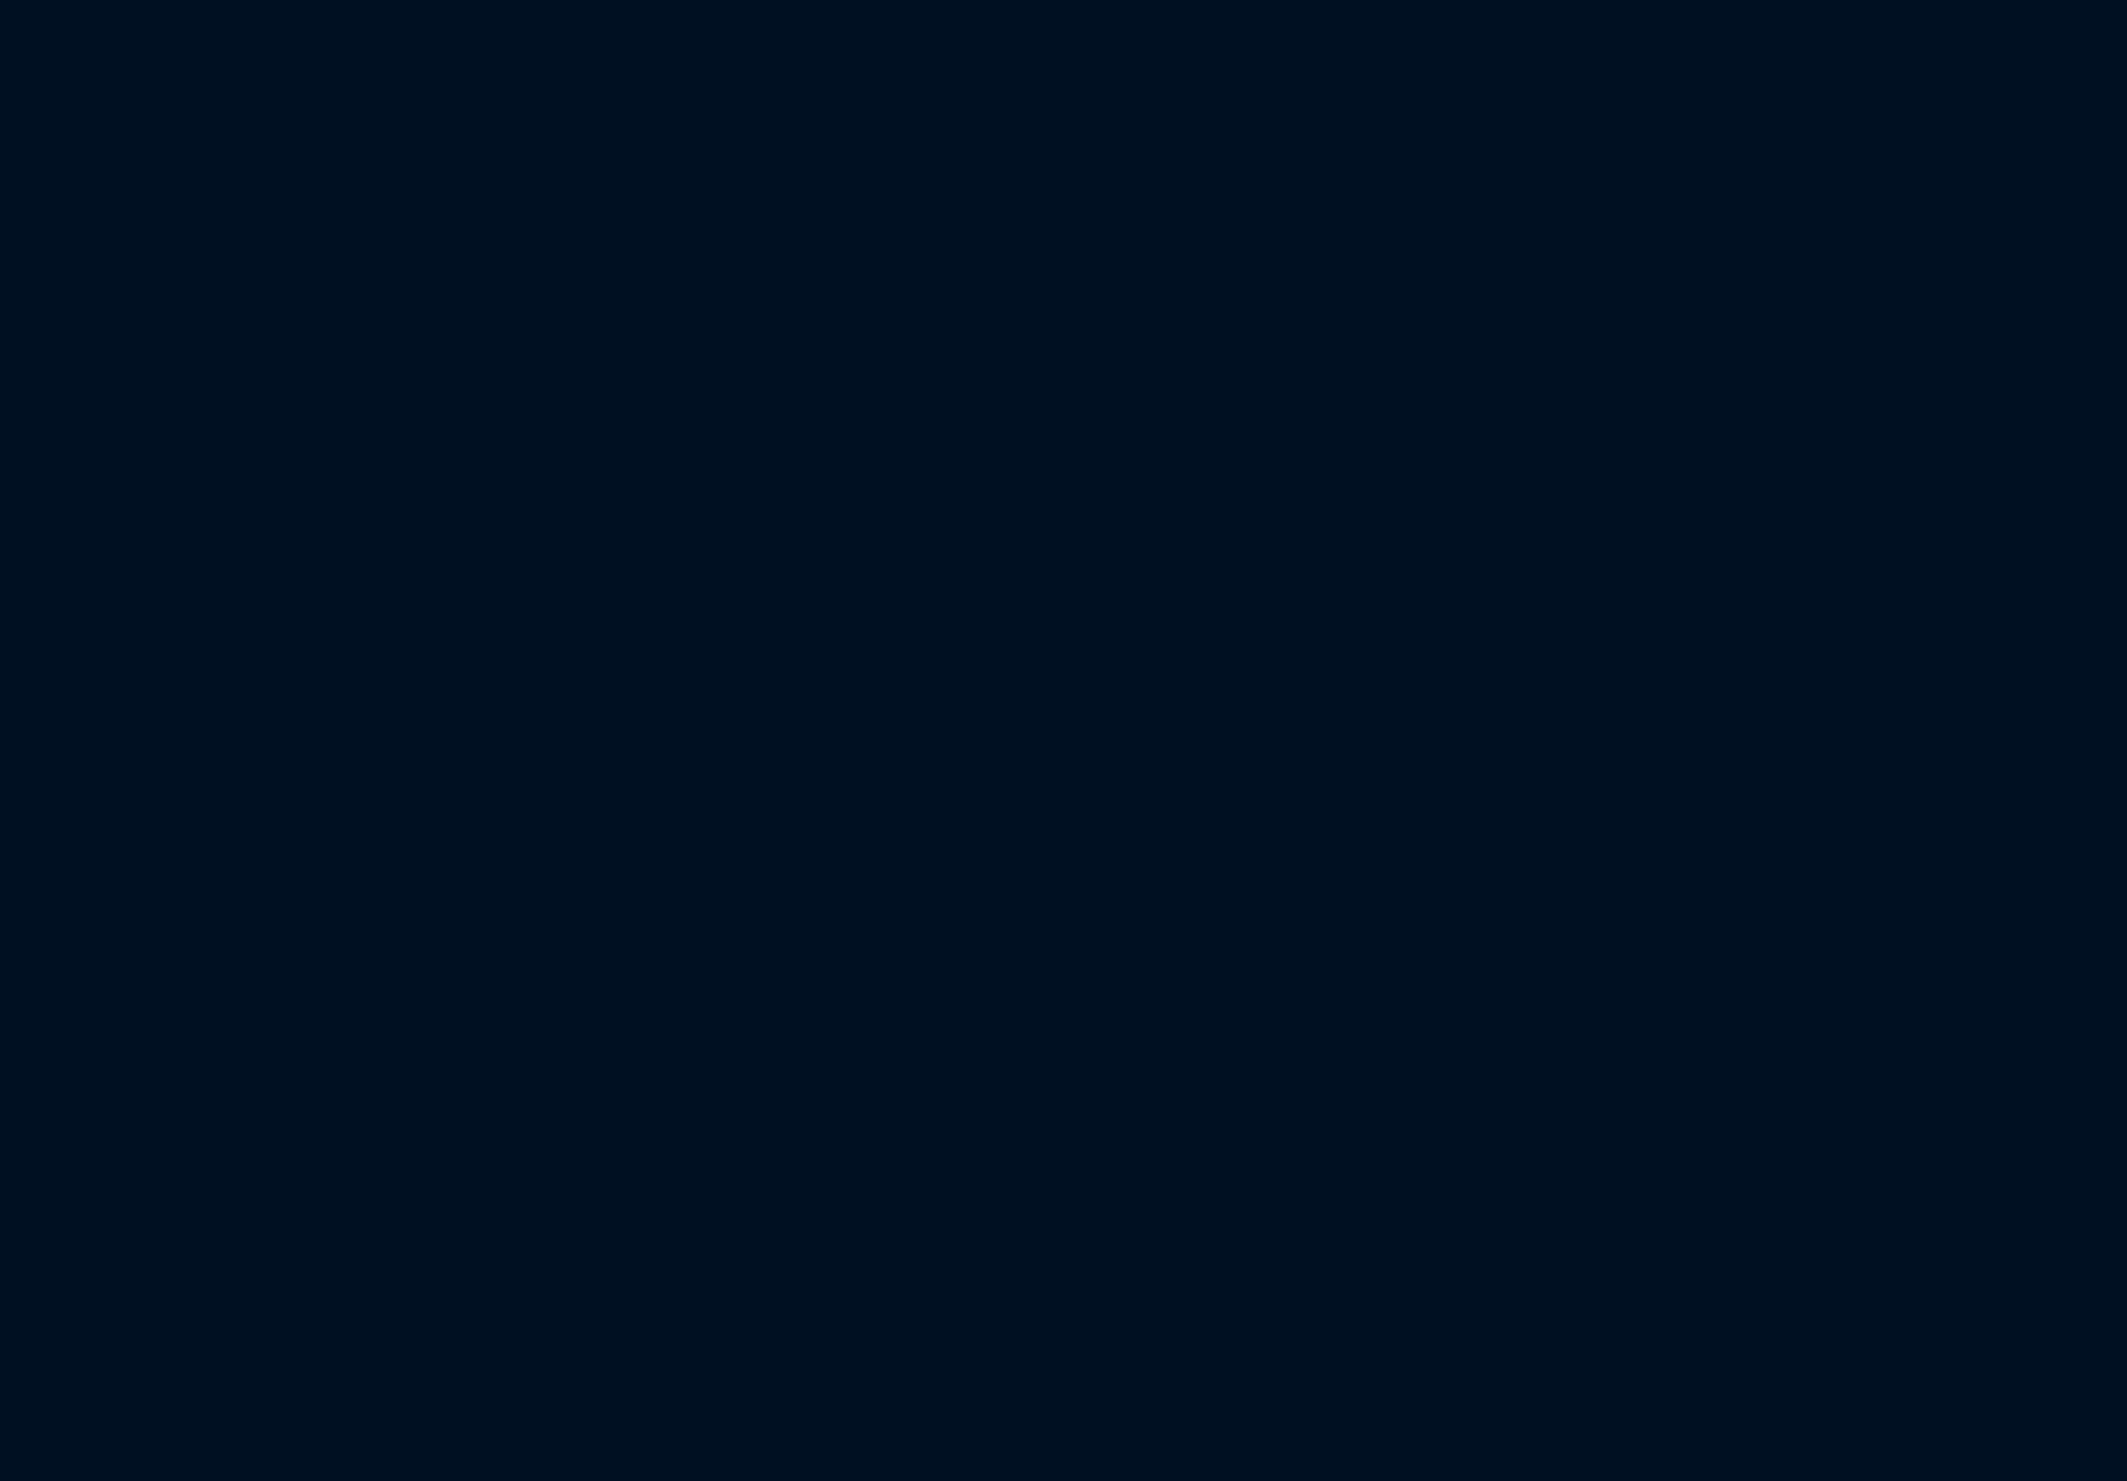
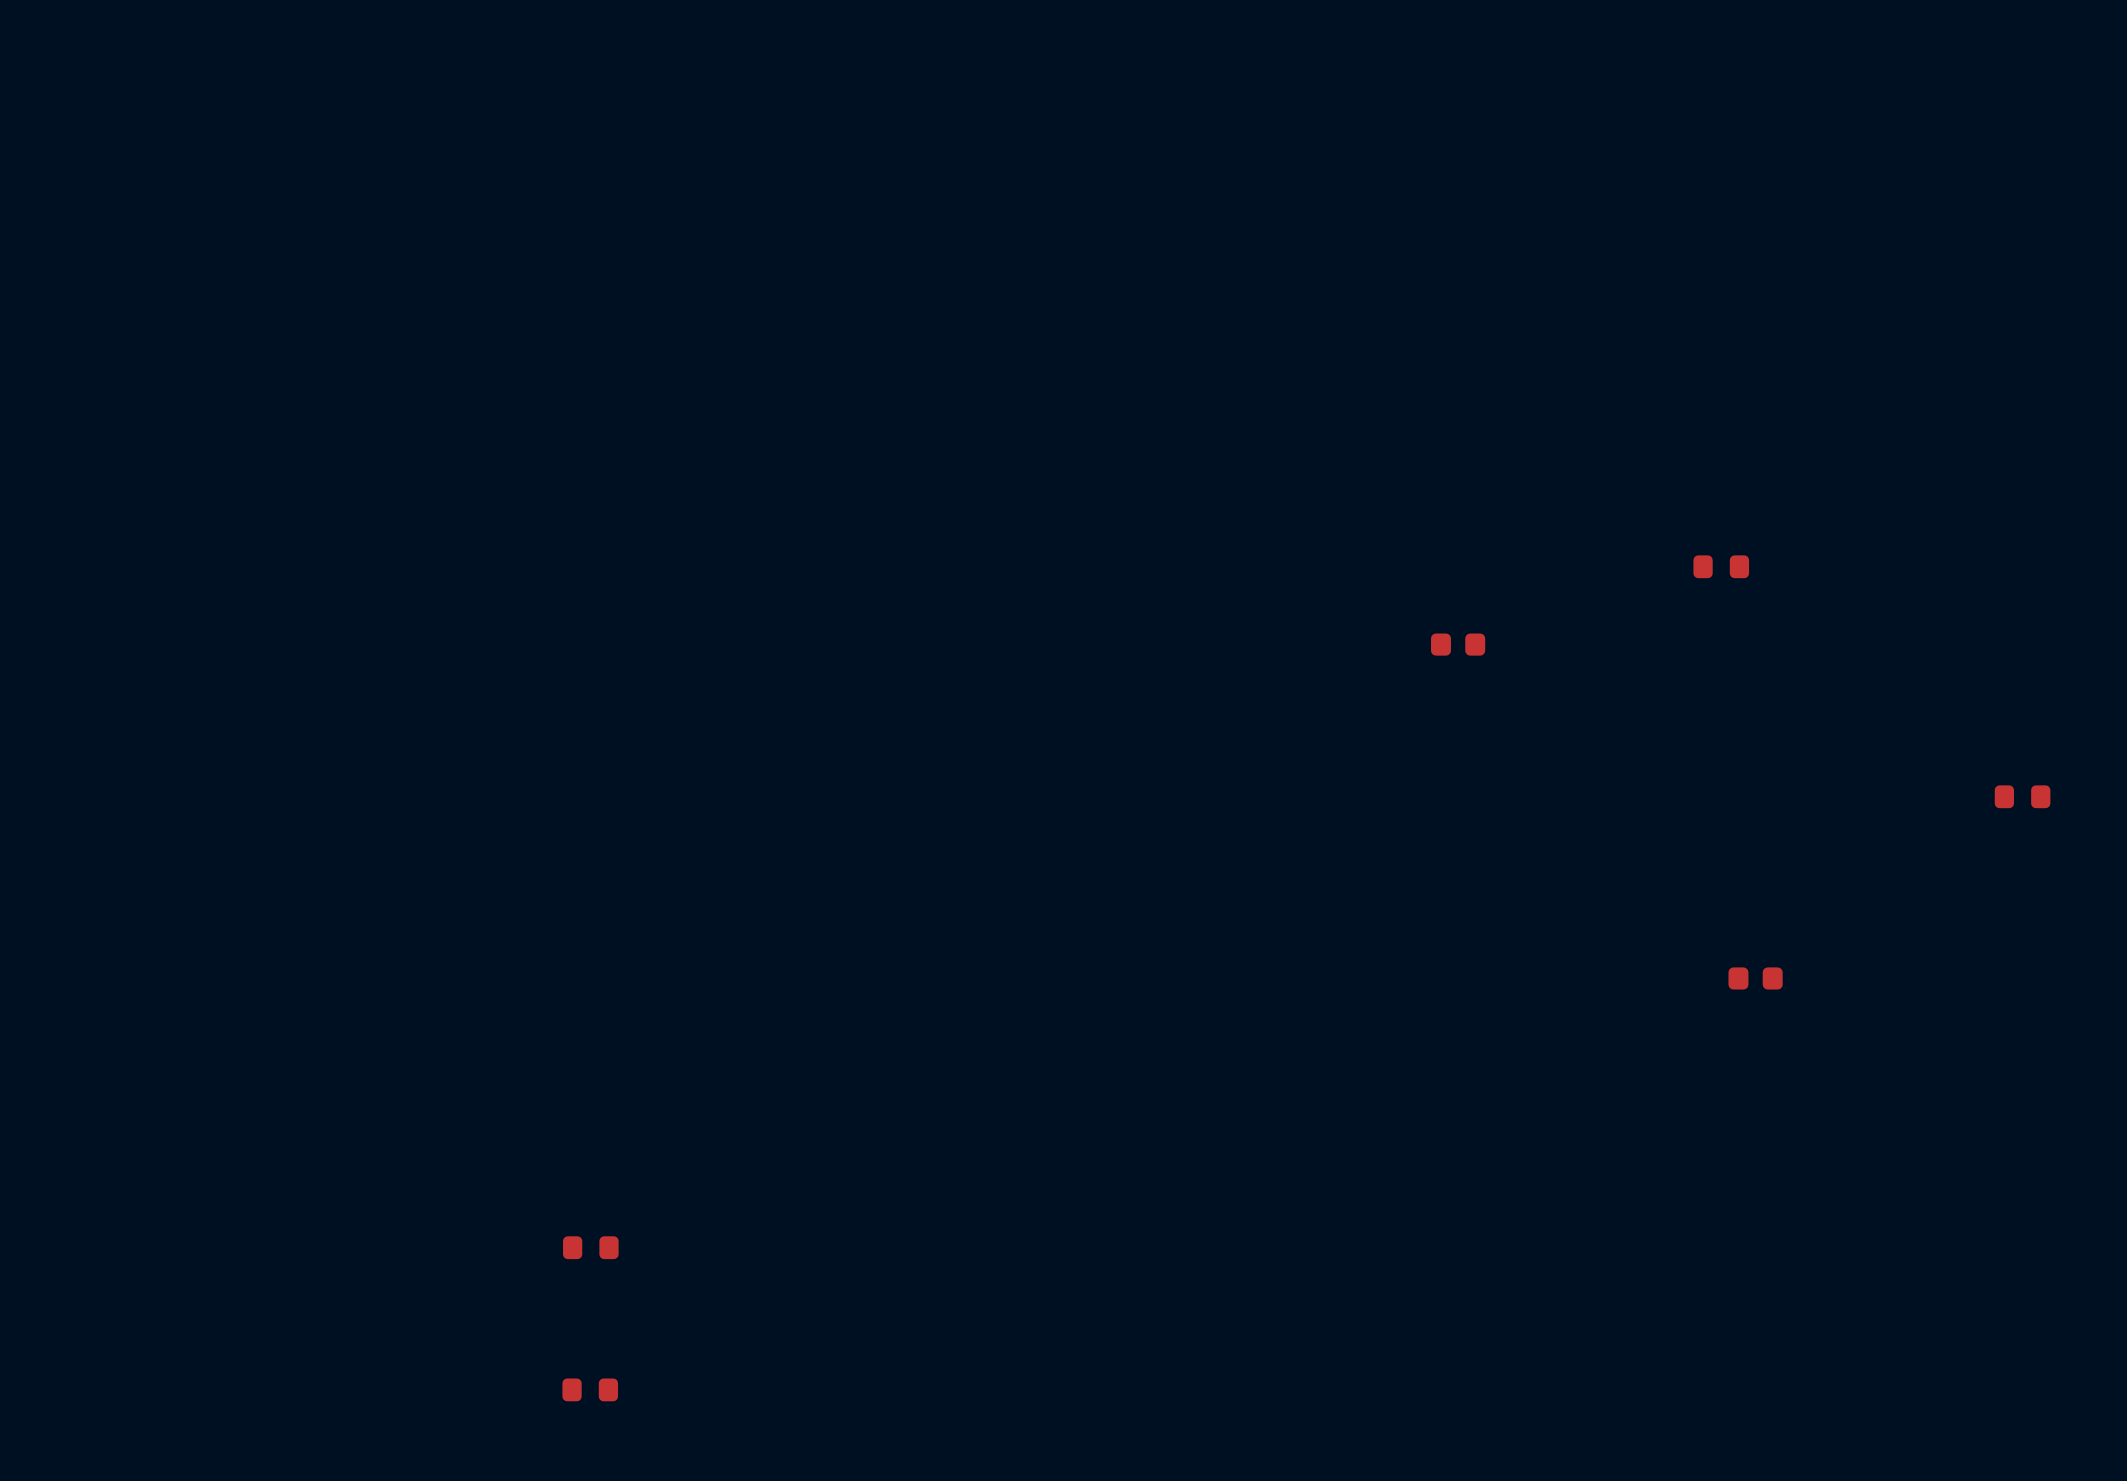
part: none -> (1721, 566)
part: none -> (1458, 644)
part: none -> (2022, 796)
part: none -> (1755, 978)
part: none -> (590, 1247)
part: none -> (590, 1389)

